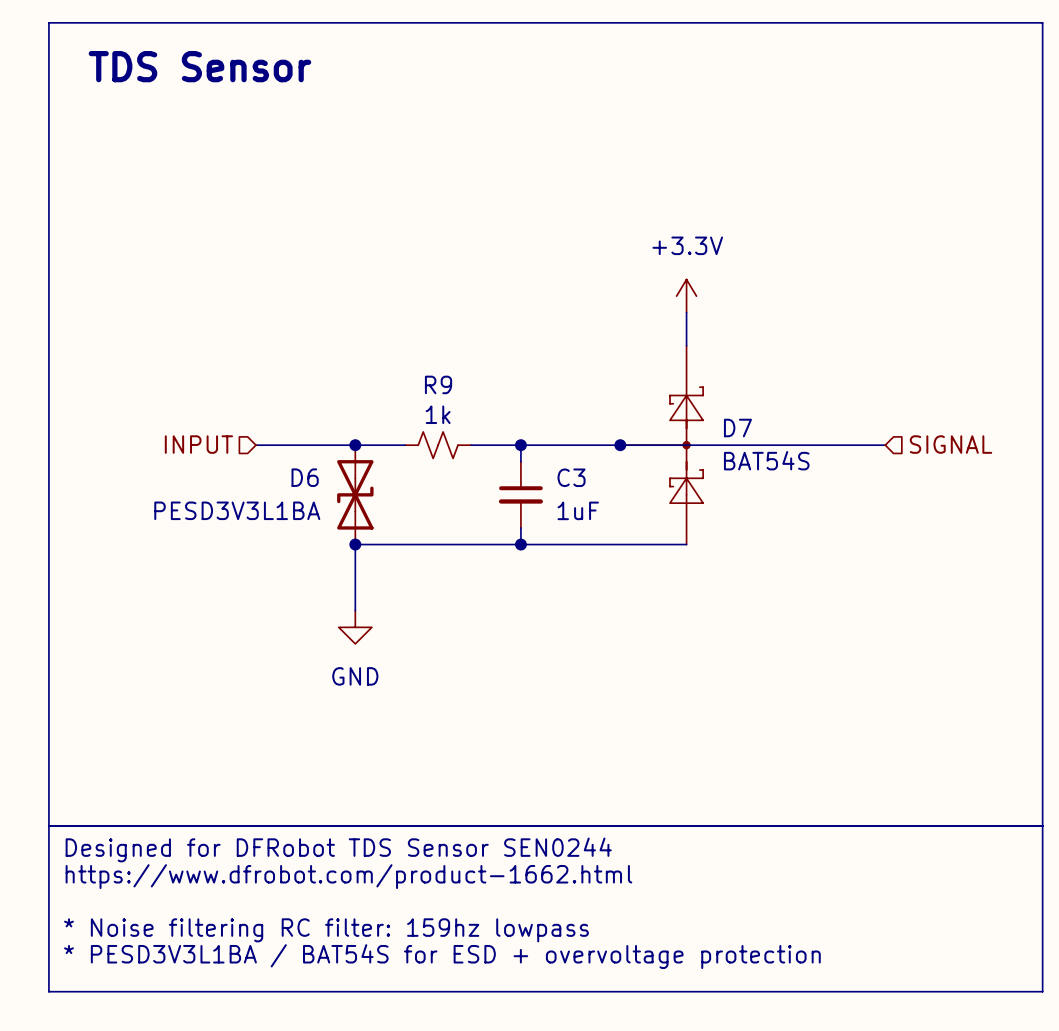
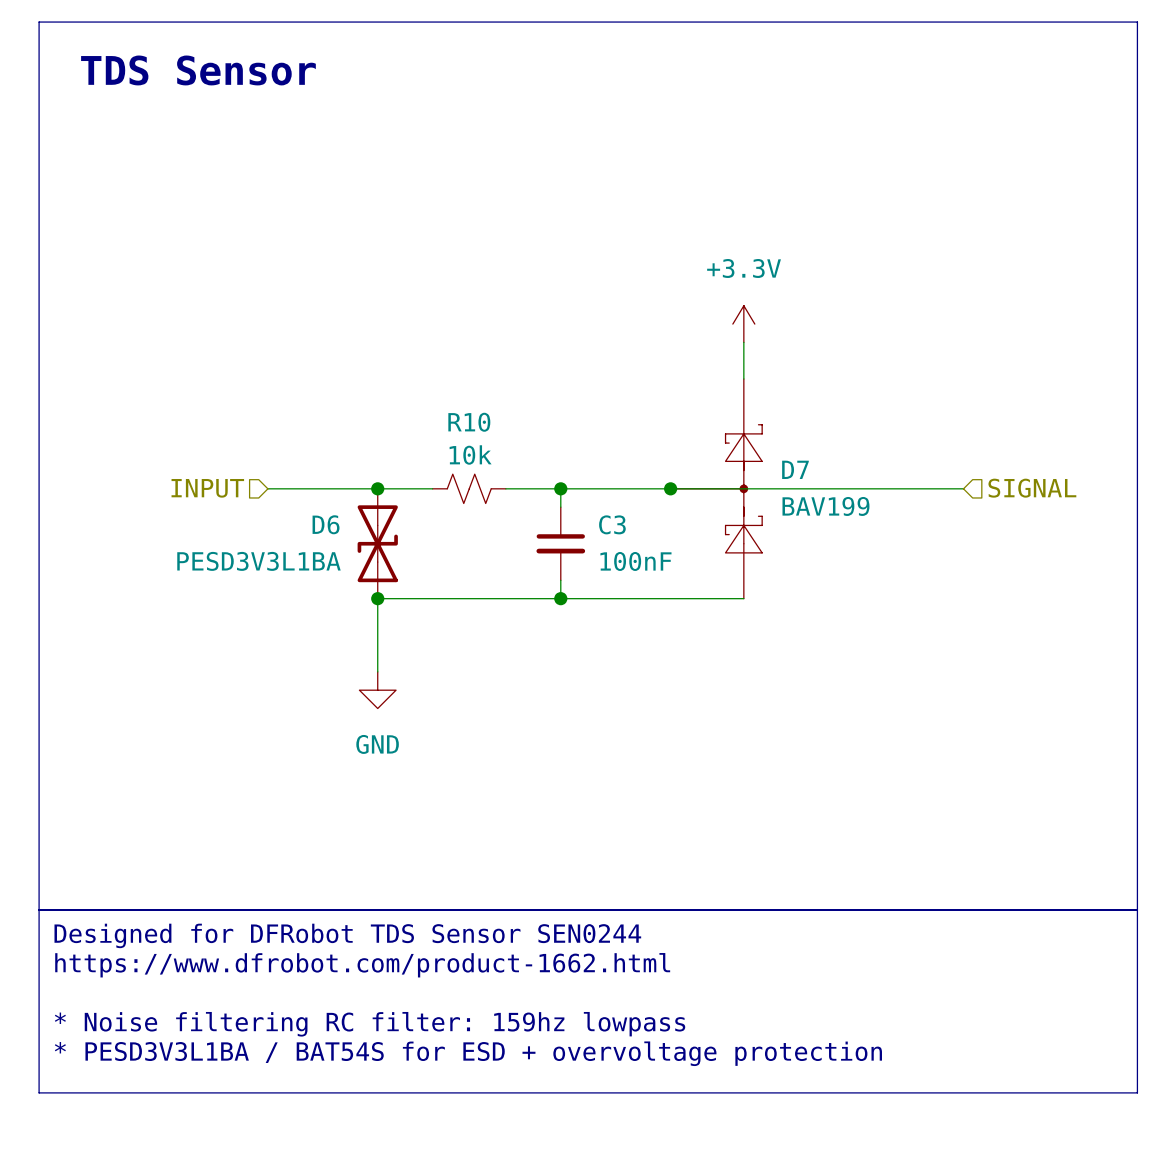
R9 name: R9 (438, 384) -> R10 (469, 422)
R9 value: 1k (438, 414) -> 10k (470, 454)
D7 value: BAT54S (766, 460) -> BAV199 (825, 506)
C3 value: 1uF (578, 510) -> 100nF (635, 561)

